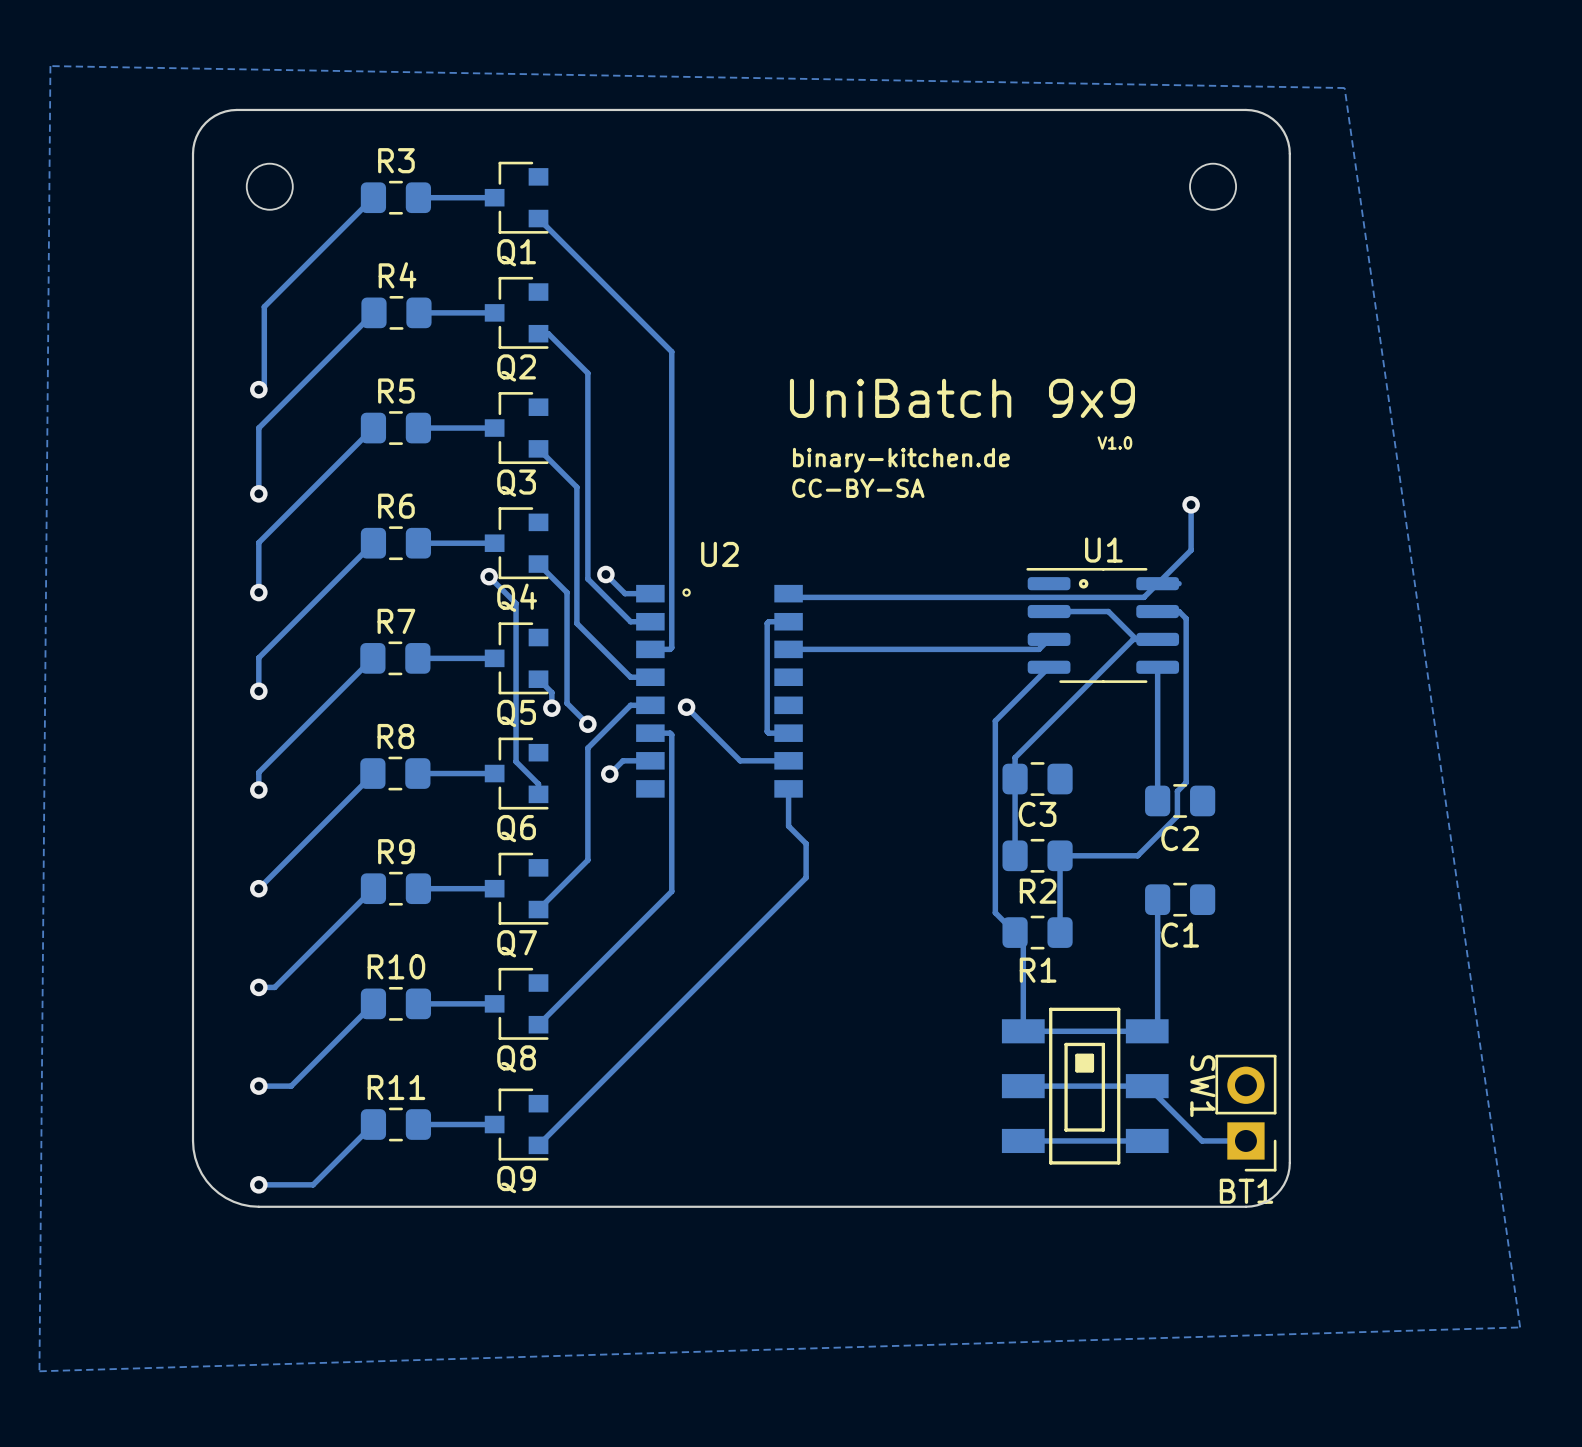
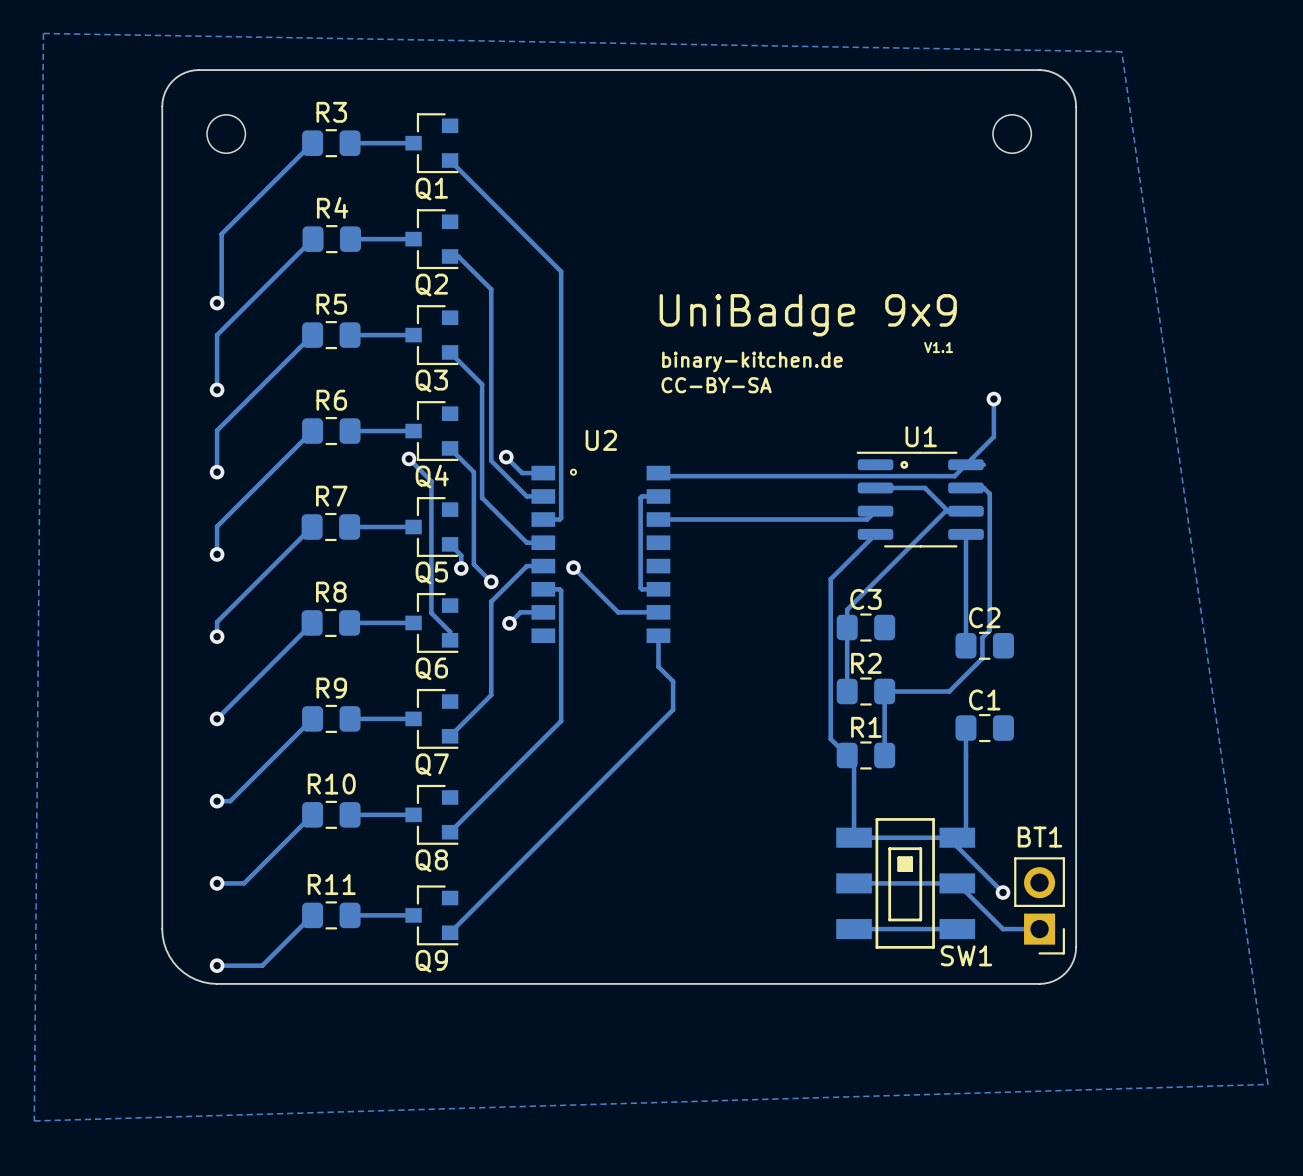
text: UniBatch 9x9 (962, 398) -> UniBadge 9x9 (808, 315)
text: V1.0 (1114, 442) -> V1.1 (938, 347)
C3 name position: C3 (1037, 814) -> C3 (865, 599)
C2 name position: C2 (1180, 838) -> C2 (984, 617)
R2 name position: R2 (1038, 891) -> R2 (866, 663)
C1 name position: C1 (1180, 935) -> C1 (984, 699)
R1 name position: R1 (1038, 970) -> R1 (866, 727)
track: none -> (957, 837) (957, 846) (1003, 892)
SW1 name rotation: 0° (1202, 1086) -> 90° counterclockwise (966, 955)
SW1 name position: SW1 (1202, 1086) -> SW1 (966, 955)
via: none -> (1003, 892)
BT1 name position: BT1 (1246, 1191) -> BT1 (1040, 837)

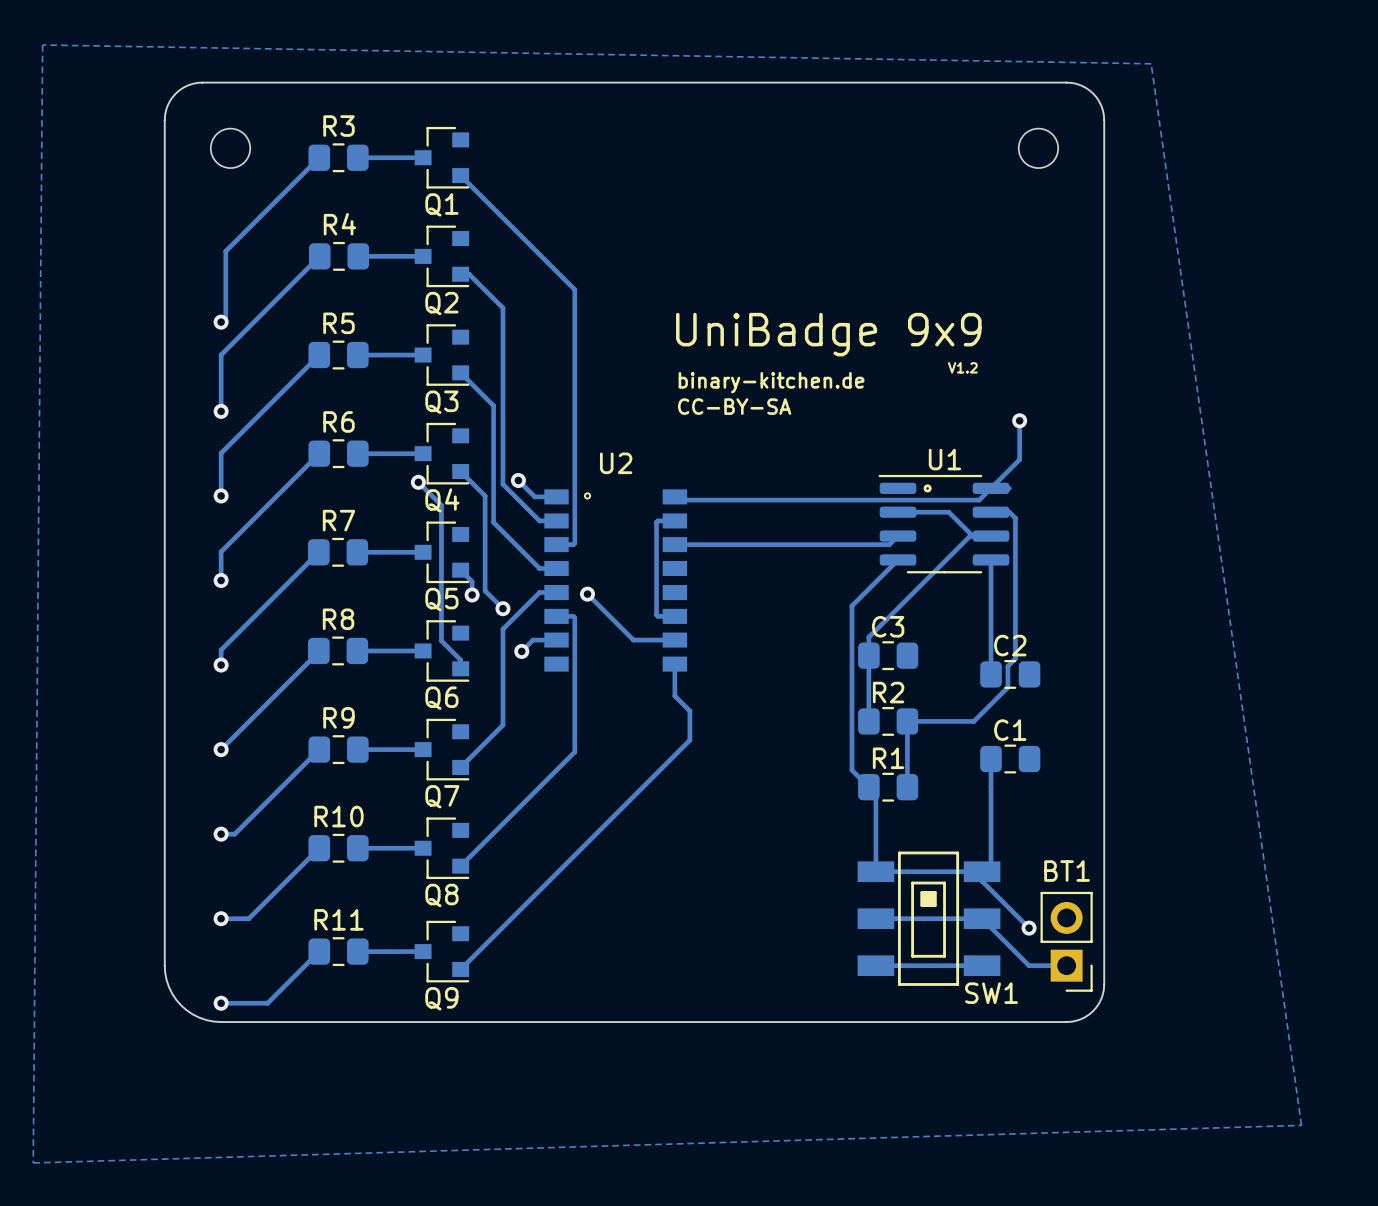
text: V1.1 (938, 347) -> V1.2 (962, 367)

